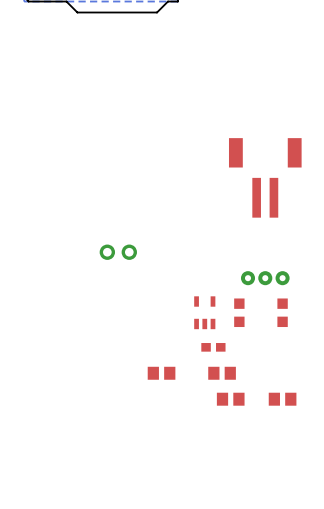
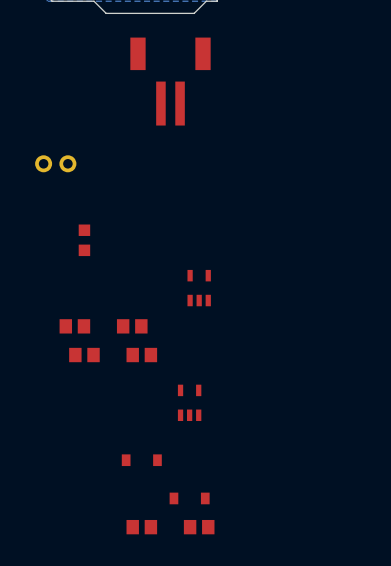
part position: (265, 177) -> (170, 81)
part: none -> (84, 240)
part position: (118, 252) -> (55, 163)
part: none -> (199, 288)
part: (265, 278) -> none
part: none -> (74, 326)
part: none -> (132, 326)
part: (204, 312) -> none
part: (239, 312) -> none
part: (282, 312) -> none
part: none -> (84, 355)
part: none -> (141, 355)
part: (213, 347) -> none
part: none -> (189, 402)
part: (161, 373) -> none
part: (222, 373) -> none
part: (230, 399) -> none
part: (282, 399) -> none
part: none -> (141, 460)
part: none -> (189, 498)
part: none -> (141, 527)
part: none -> (199, 527)

